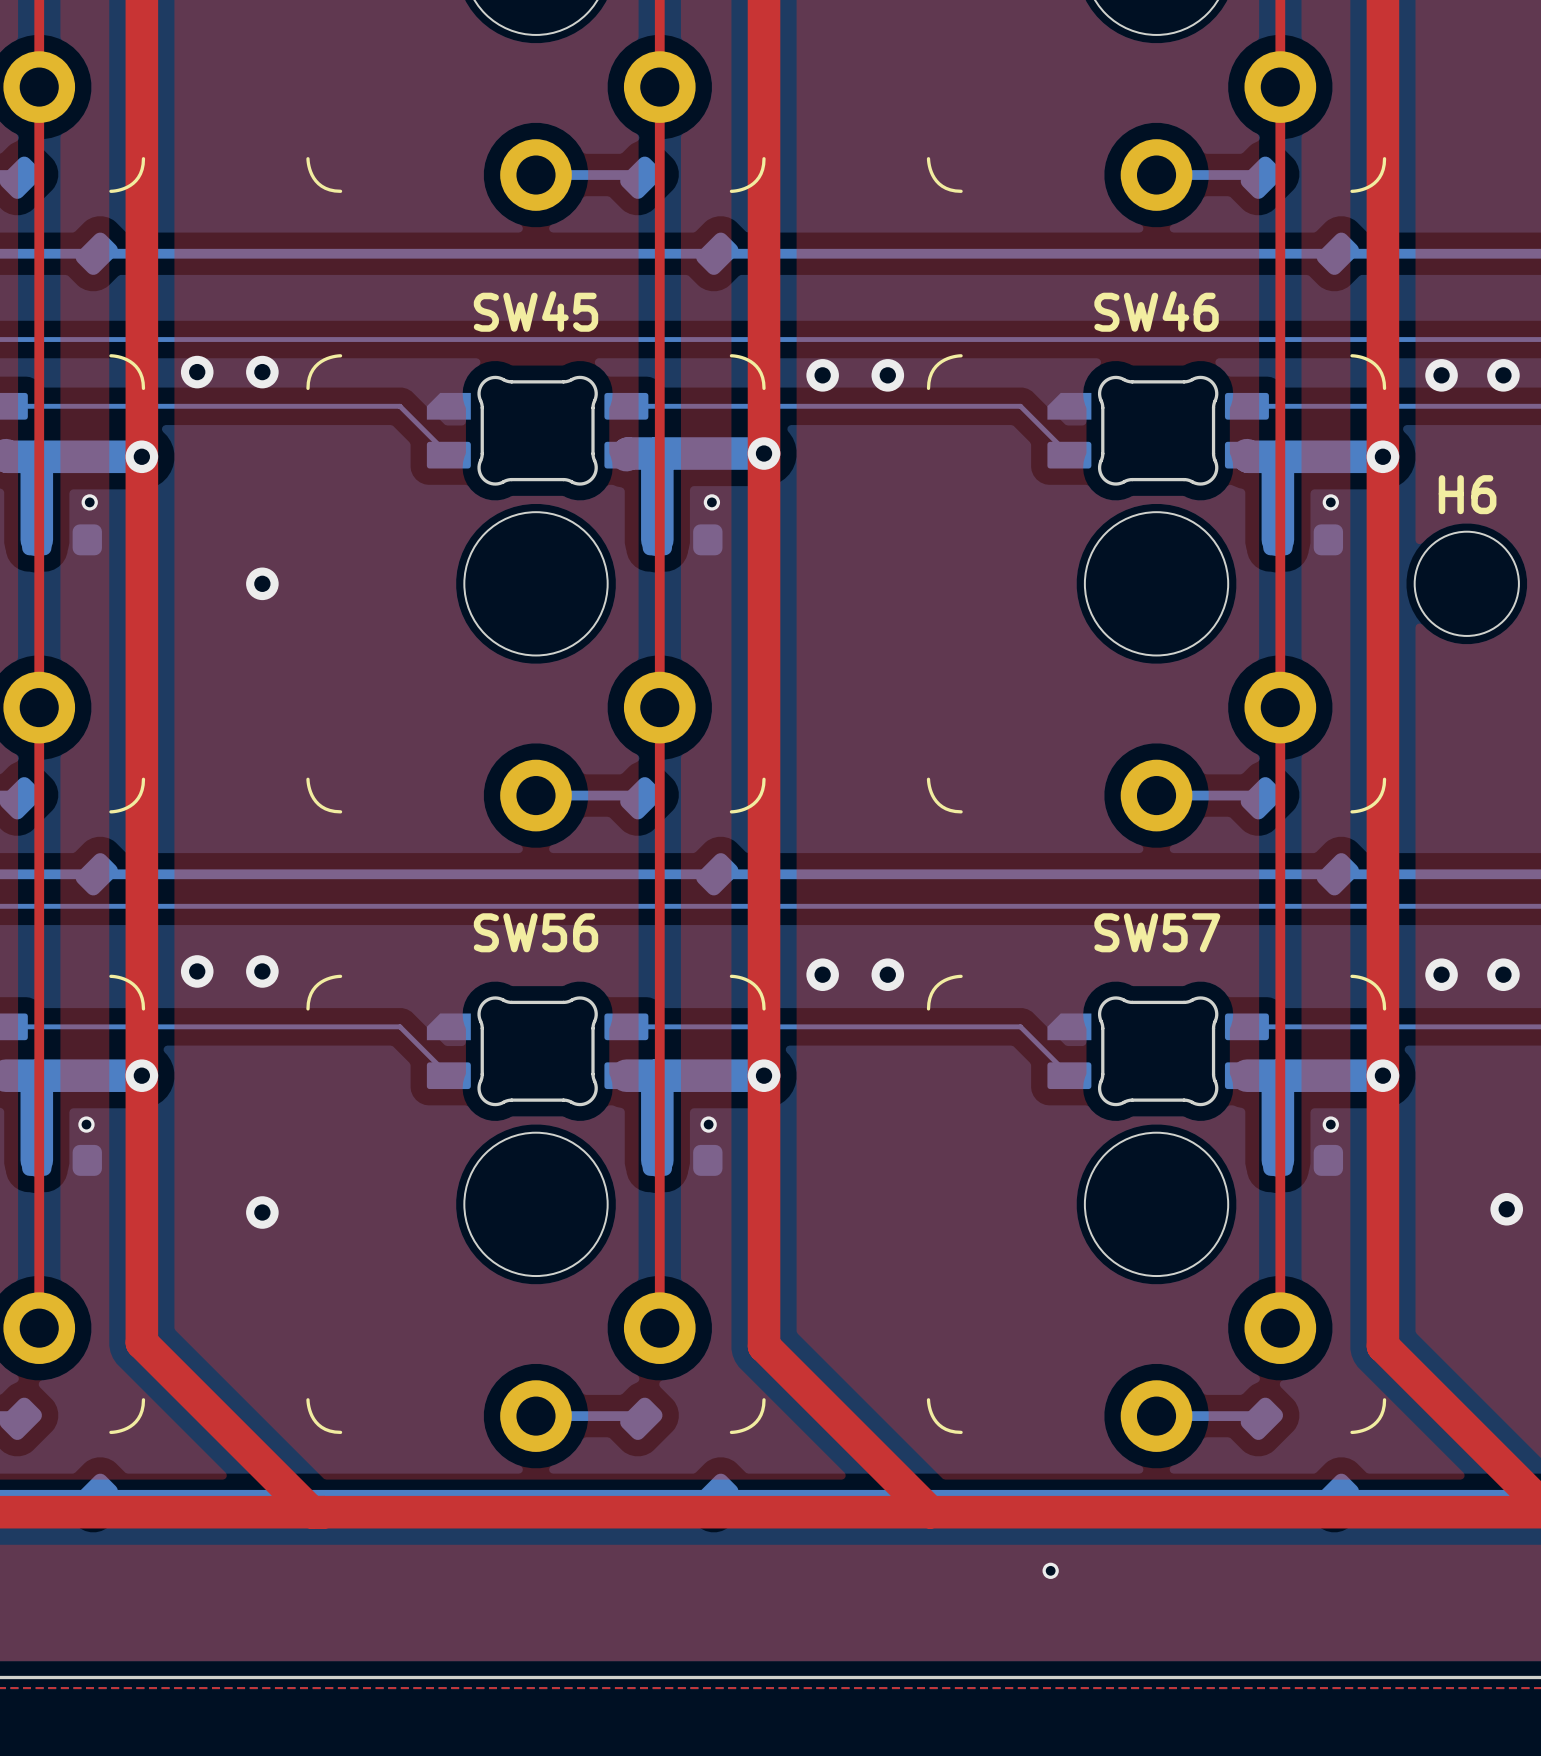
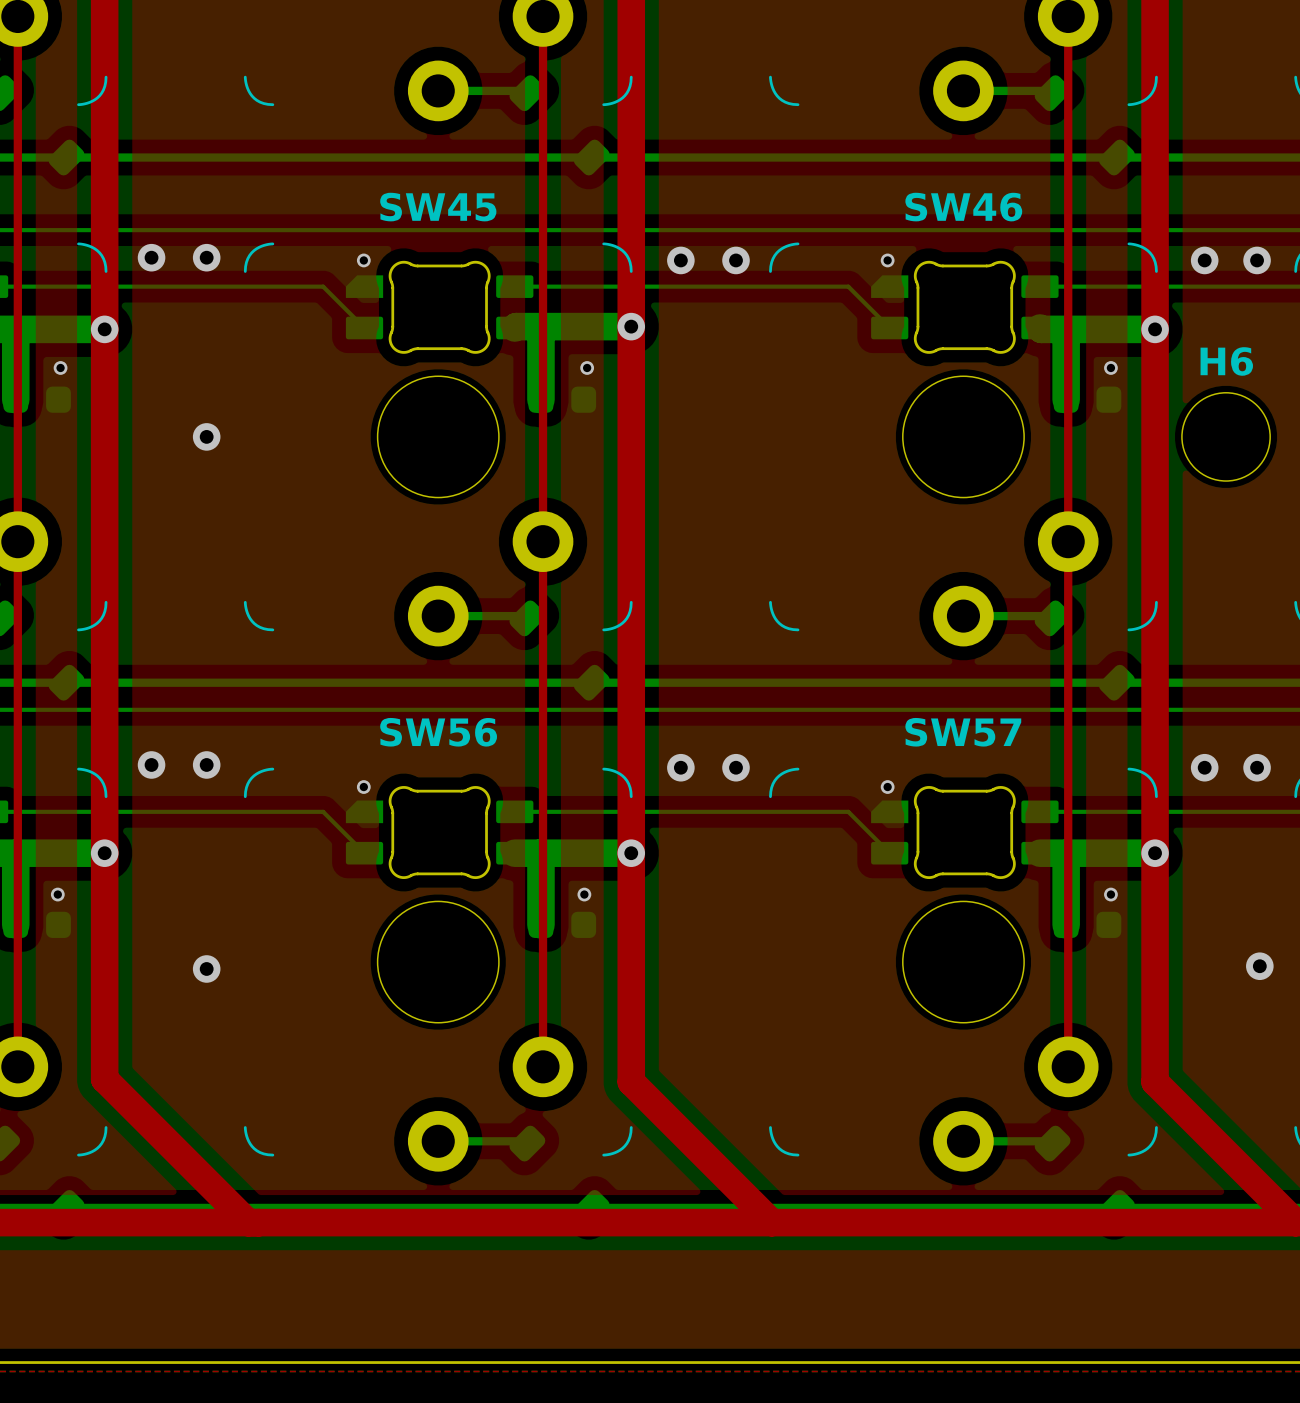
via: none -> (363, 260)
via: none -> (887, 260)
via: none -> (363, 787)
via: none -> (887, 787)
via: (1050, 1570) -> none

